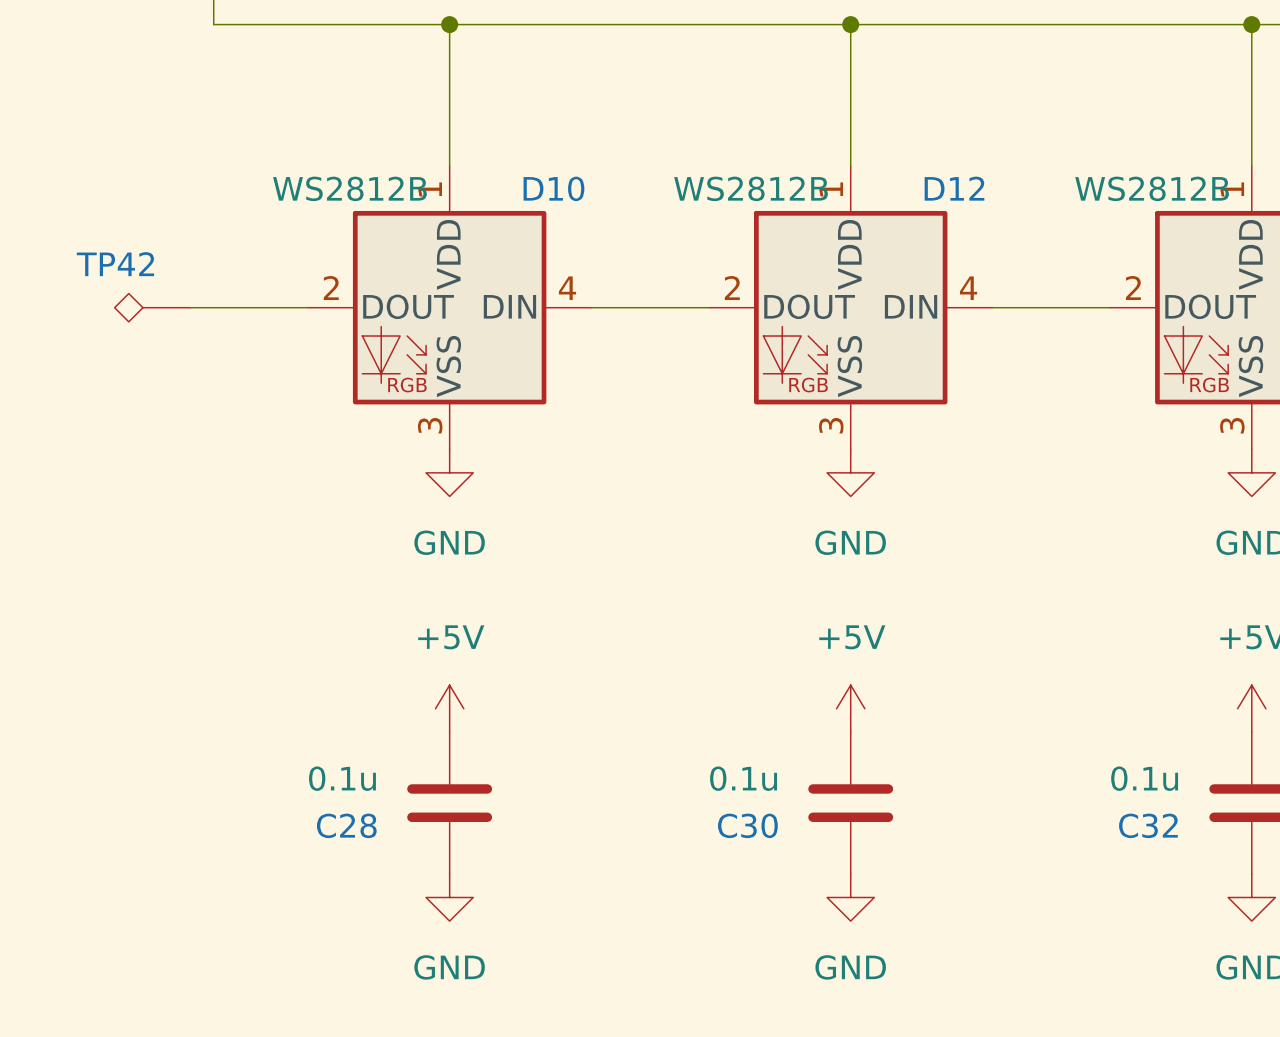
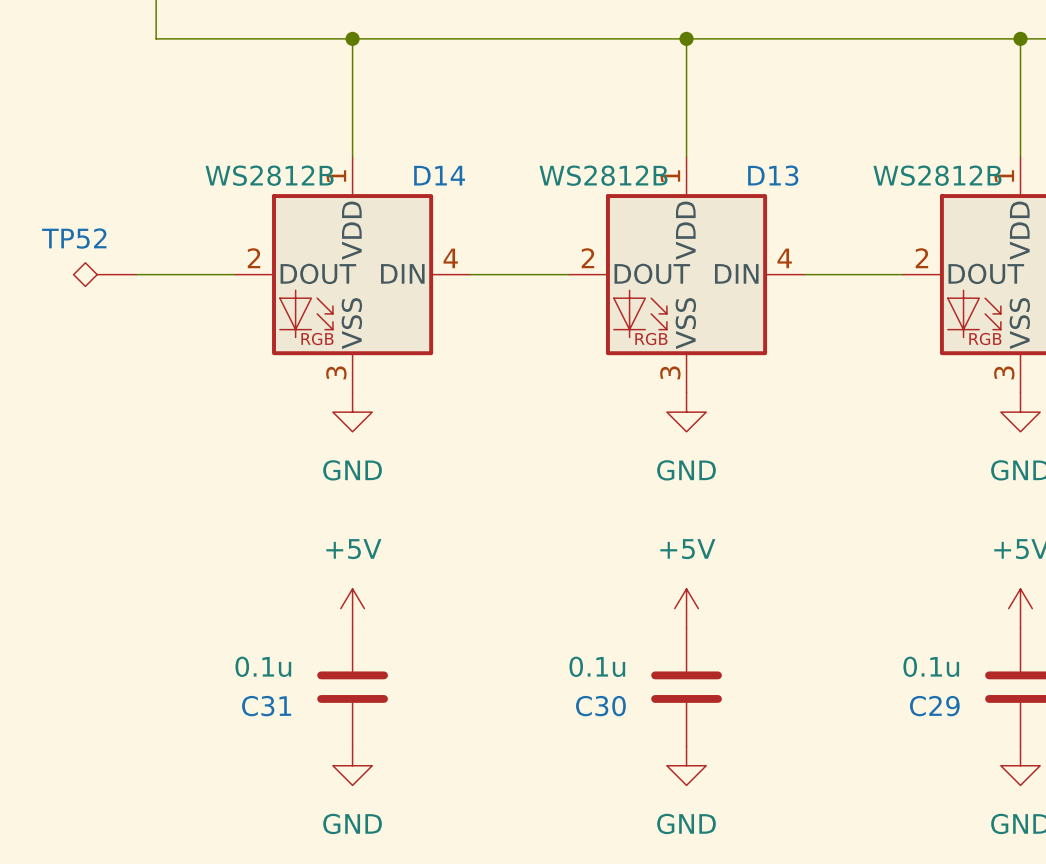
D10 name: D10 (553, 188) -> D14 (439, 175)
D12 name: D12 (954, 188) -> D13 (773, 175)
TP42 name: TP42 (115, 264) -> TP52 (74, 238)
C28 name: C28 (346, 825) -> C31 (266, 706)
C32 name: C32 (1148, 825) -> C29 (934, 706)

